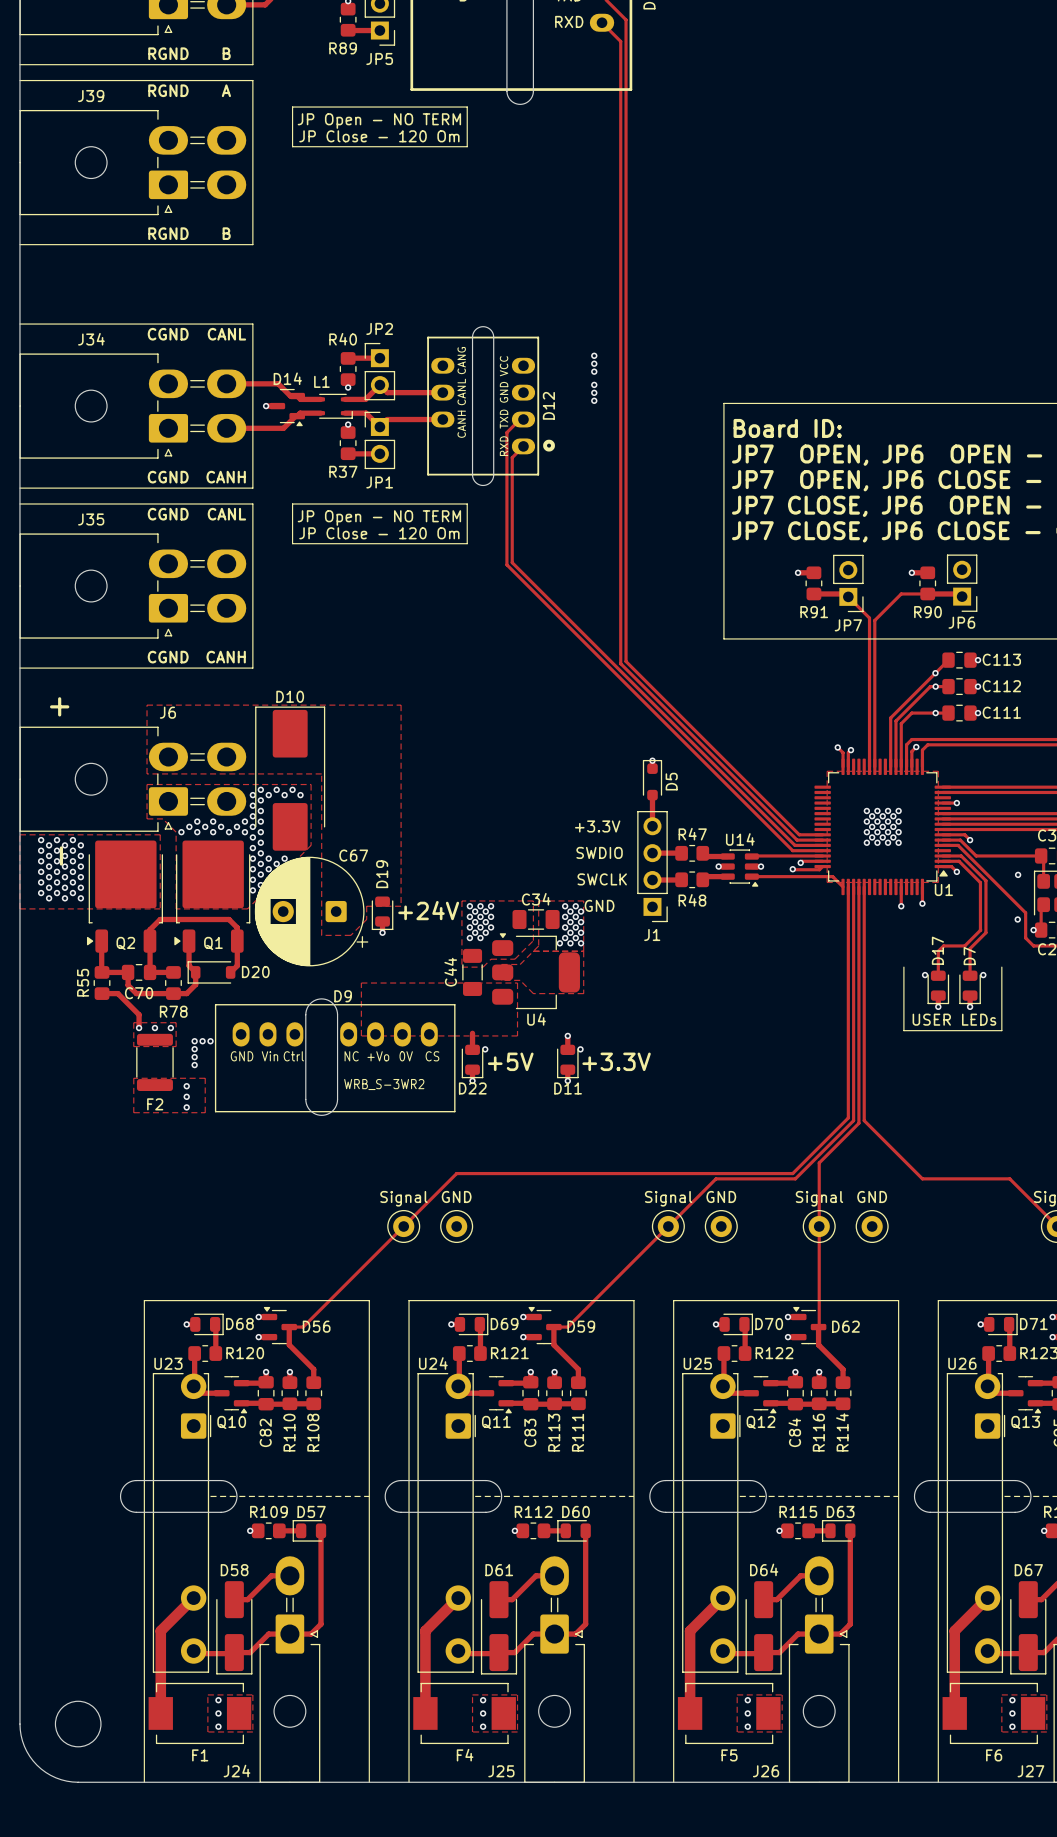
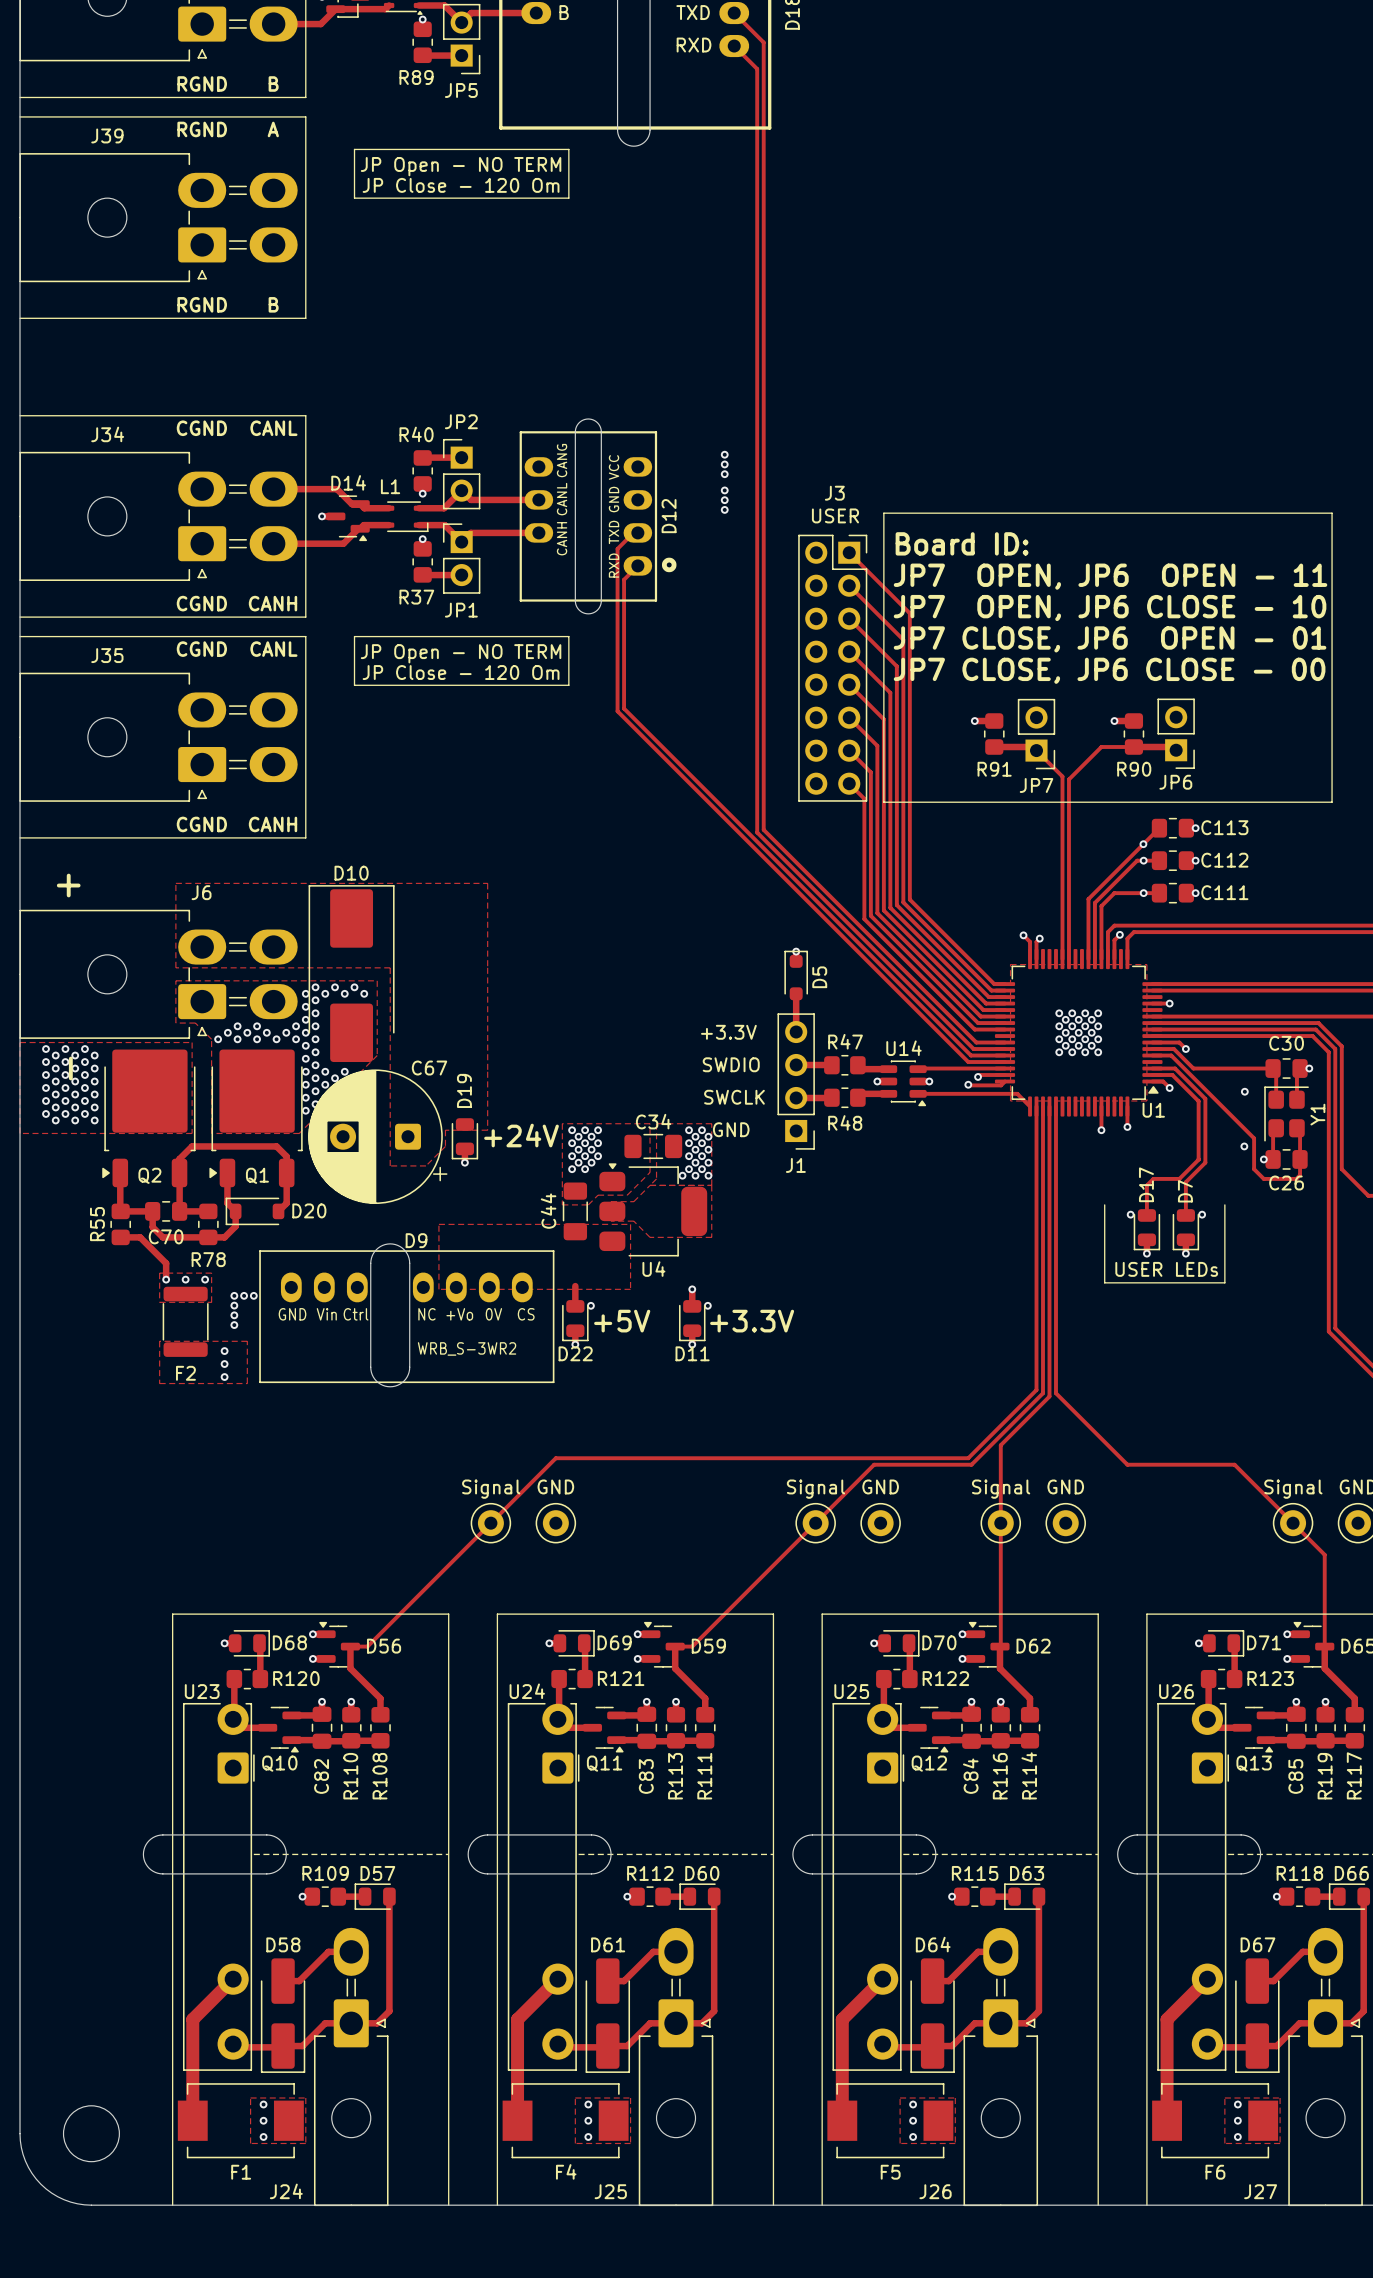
text: none -> USER (835, 515)
track: none -> (849, 552) (909, 613) (909, 899) (994, 984) (1005, 984)
track: none -> (849, 585) (903, 639) (903, 902) (991, 990) (1005, 990)
track: none -> (849, 618) (896, 666) (896, 905) (988, 997) (1005, 997)
track: none -> (849, 651) (890, 692) (890, 907) (986, 1003) (1005, 1003)
J3: none -> (832, 668)
track: none -> (849, 684) (883, 719) (883, 910) (983, 1010) (1005, 1010)
track: none -> (849, 717) (877, 745) (877, 913) (980, 1016) (1005, 1016)
track: none -> (849, 750) (870, 772) (870, 915) (978, 1023) (1005, 1023)
track: none -> (849, 783) (864, 798) (864, 919) (974, 1029) (1005, 1029)

